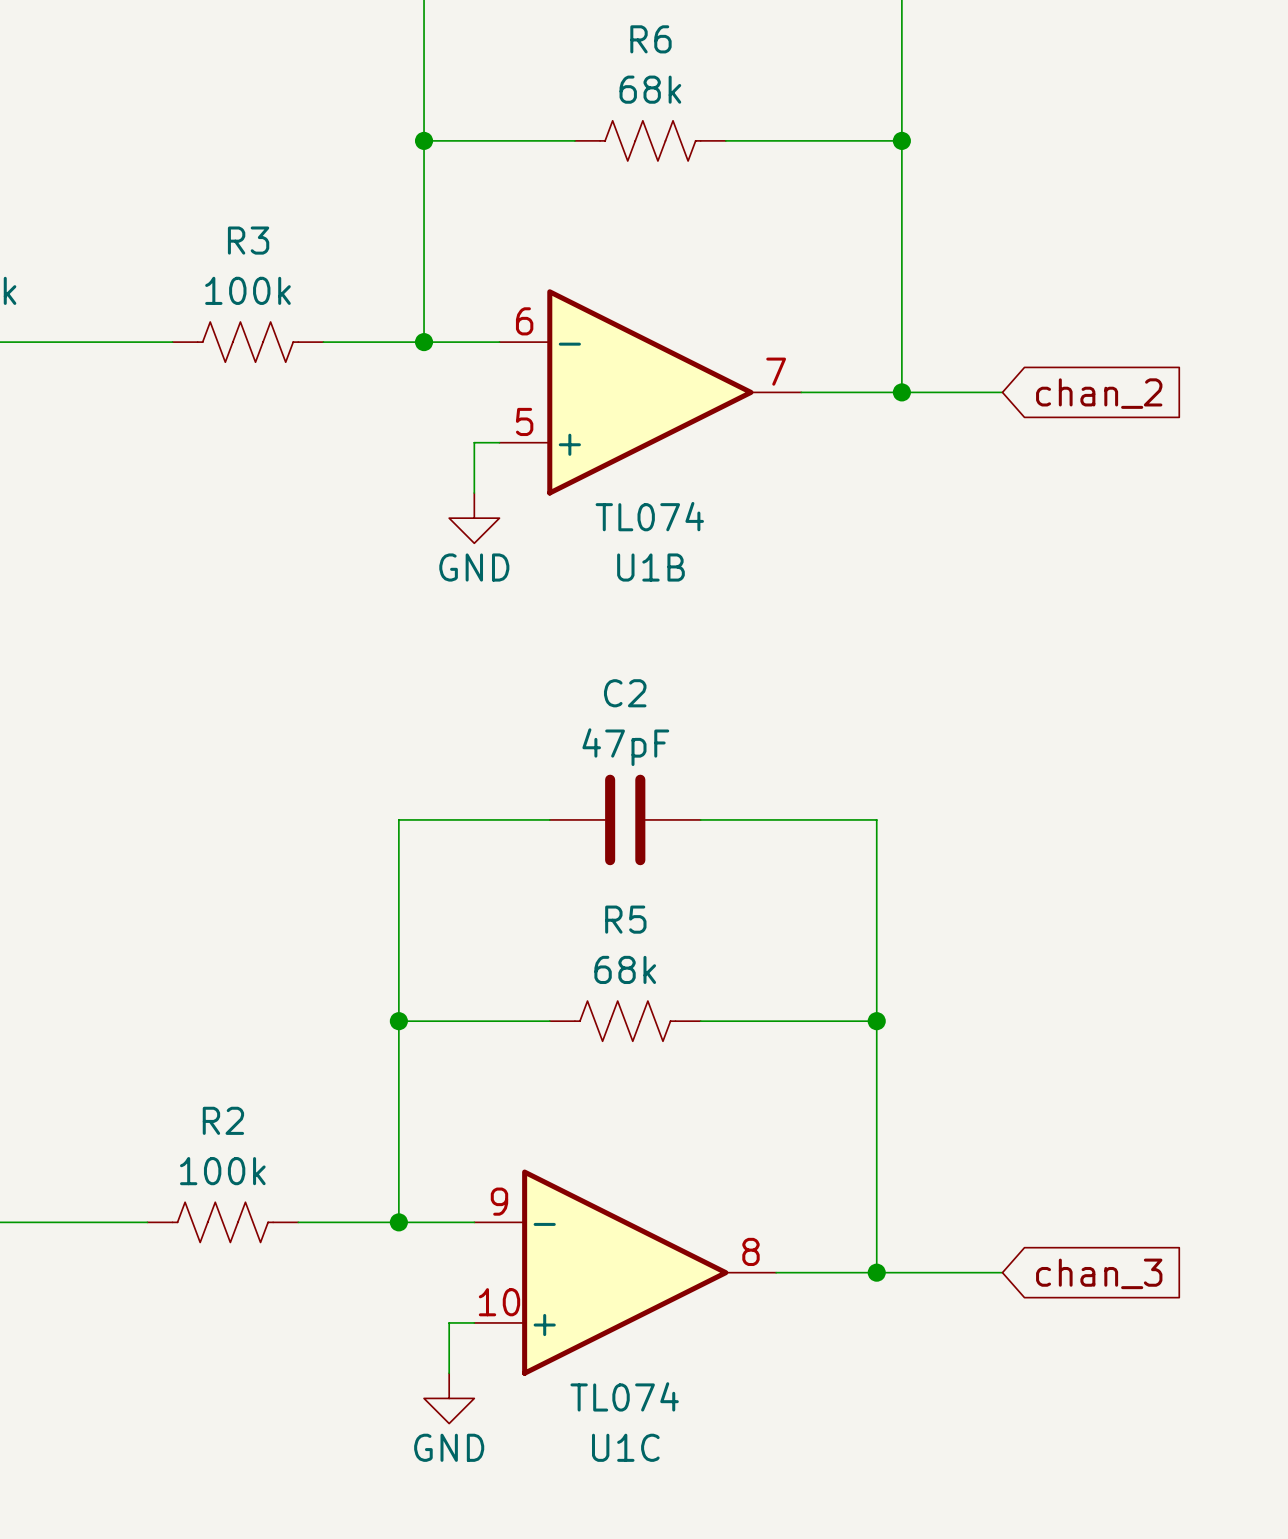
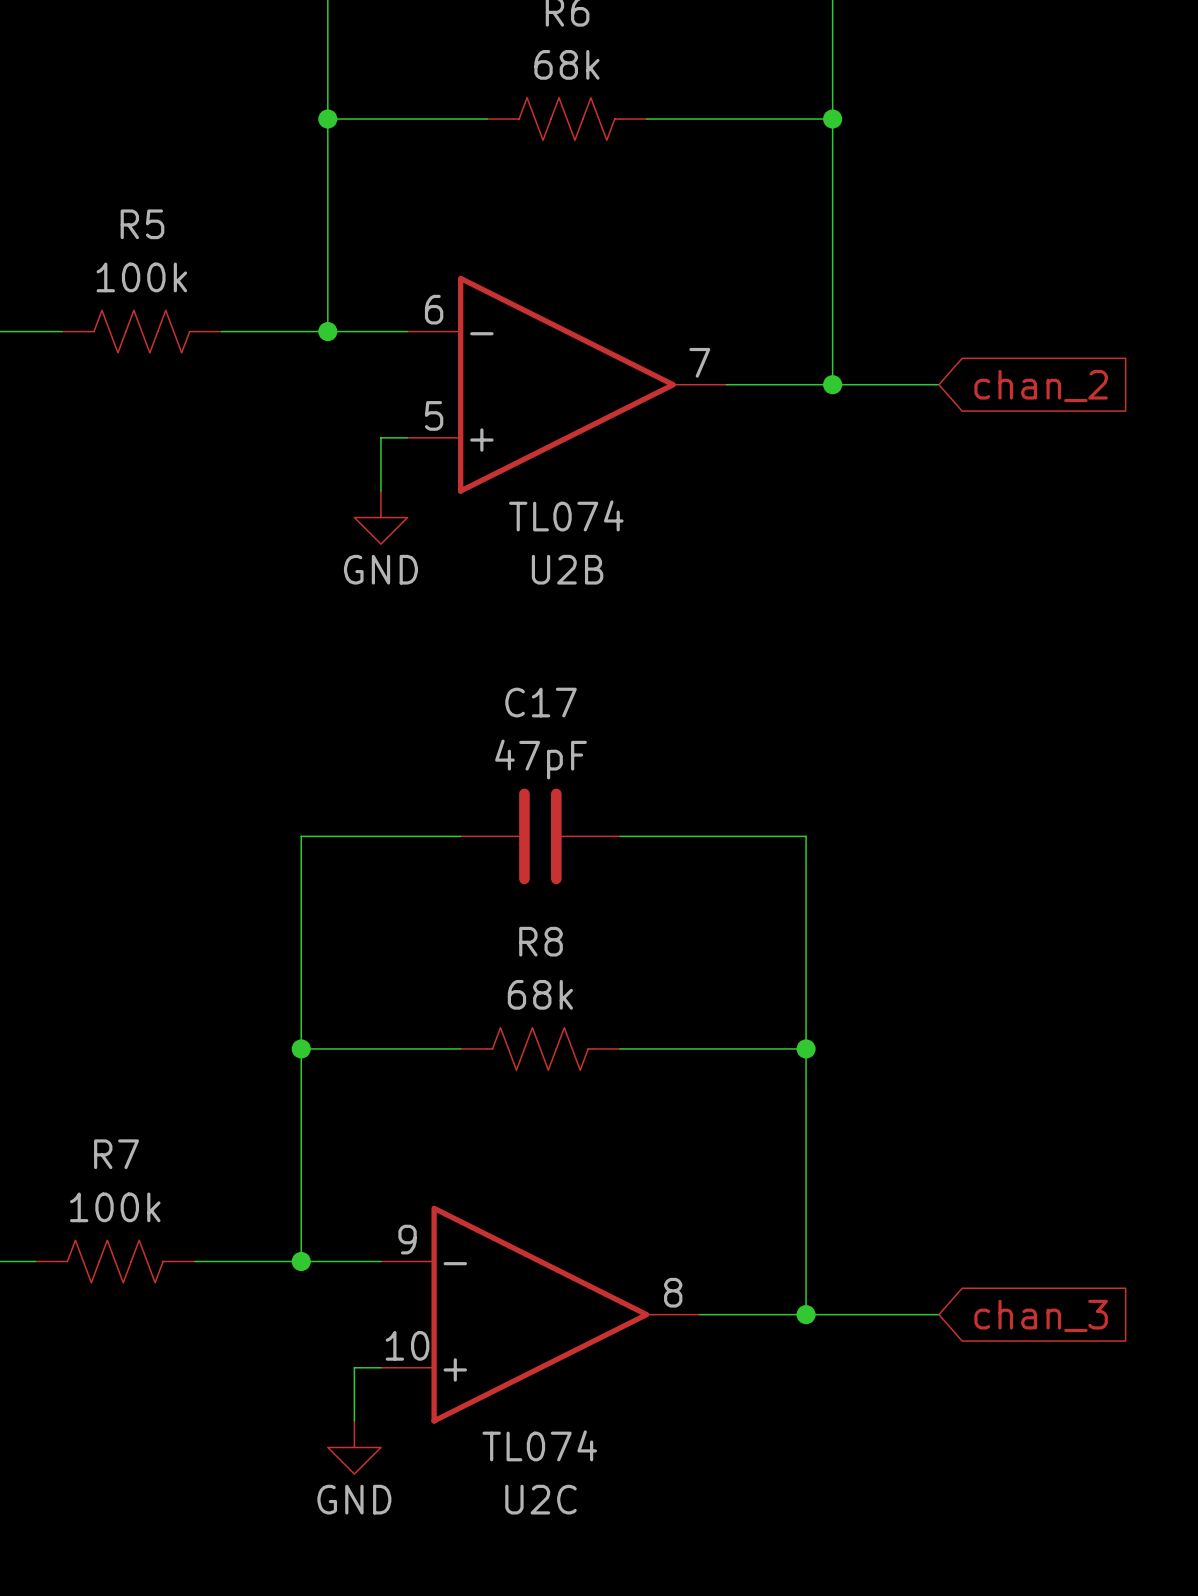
R3 name: R3 (248, 240) -> R5 (142, 224)
U1B name: U1B (650, 567) -> U2B (567, 569)
C2 name: C2 (625, 693) -> C17 (541, 702)
R5 name: R5 (625, 919) -> R8 (541, 941)
R2 name: R2 (223, 1120) -> R7 (116, 1154)
U1C name: U1C (625, 1447) -> U2C (541, 1499)

